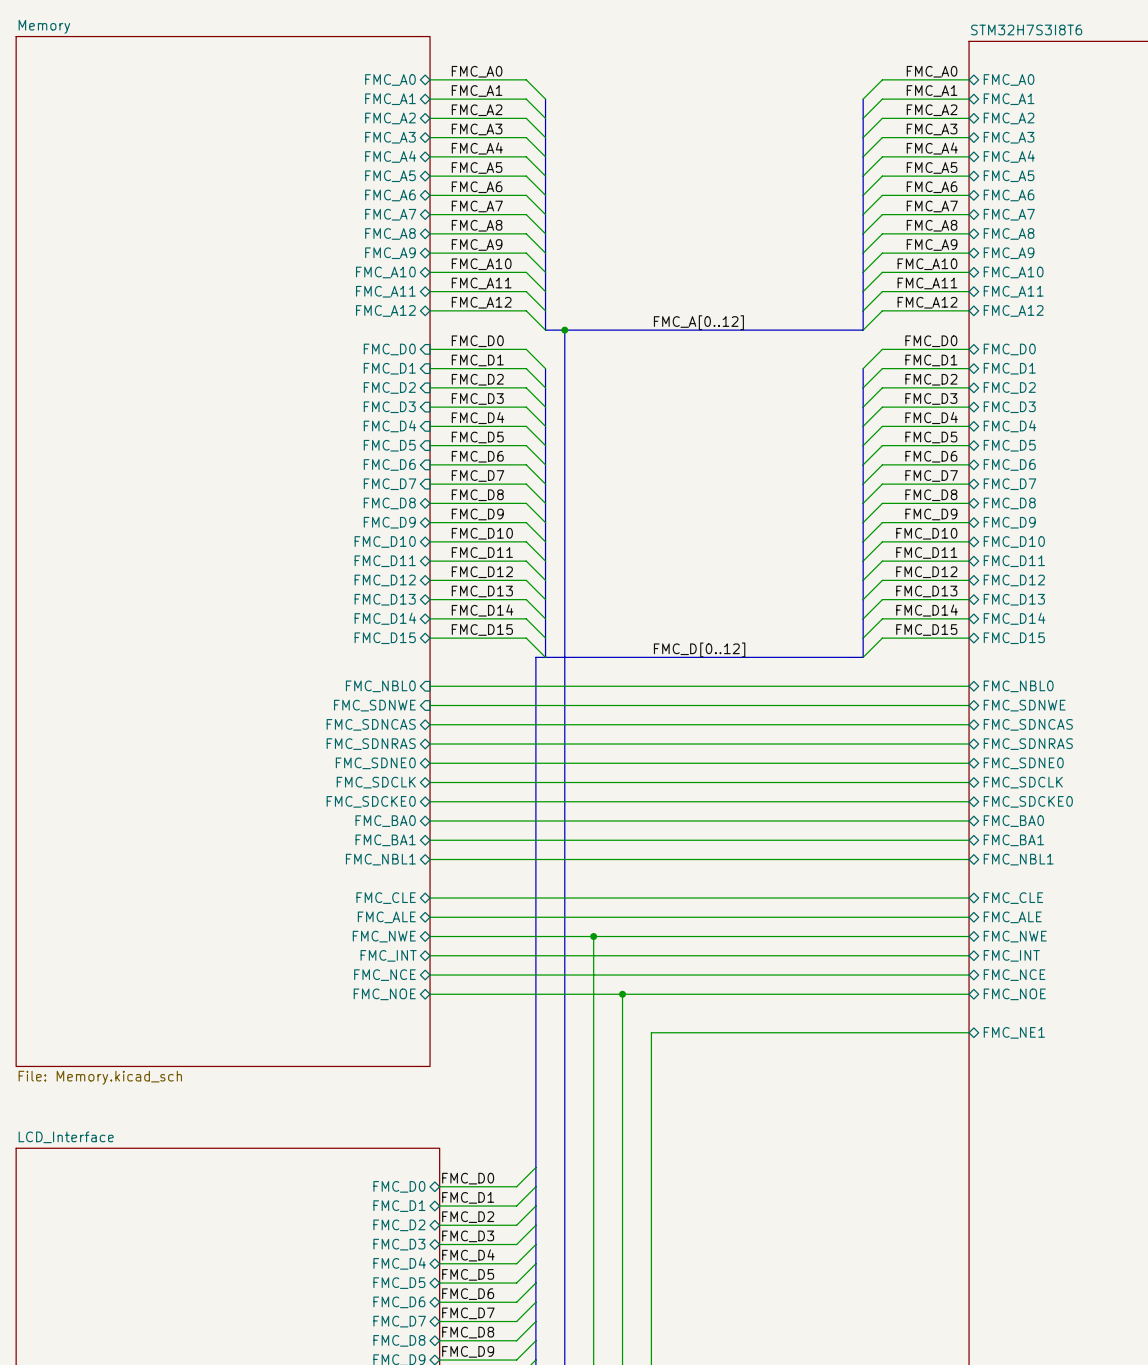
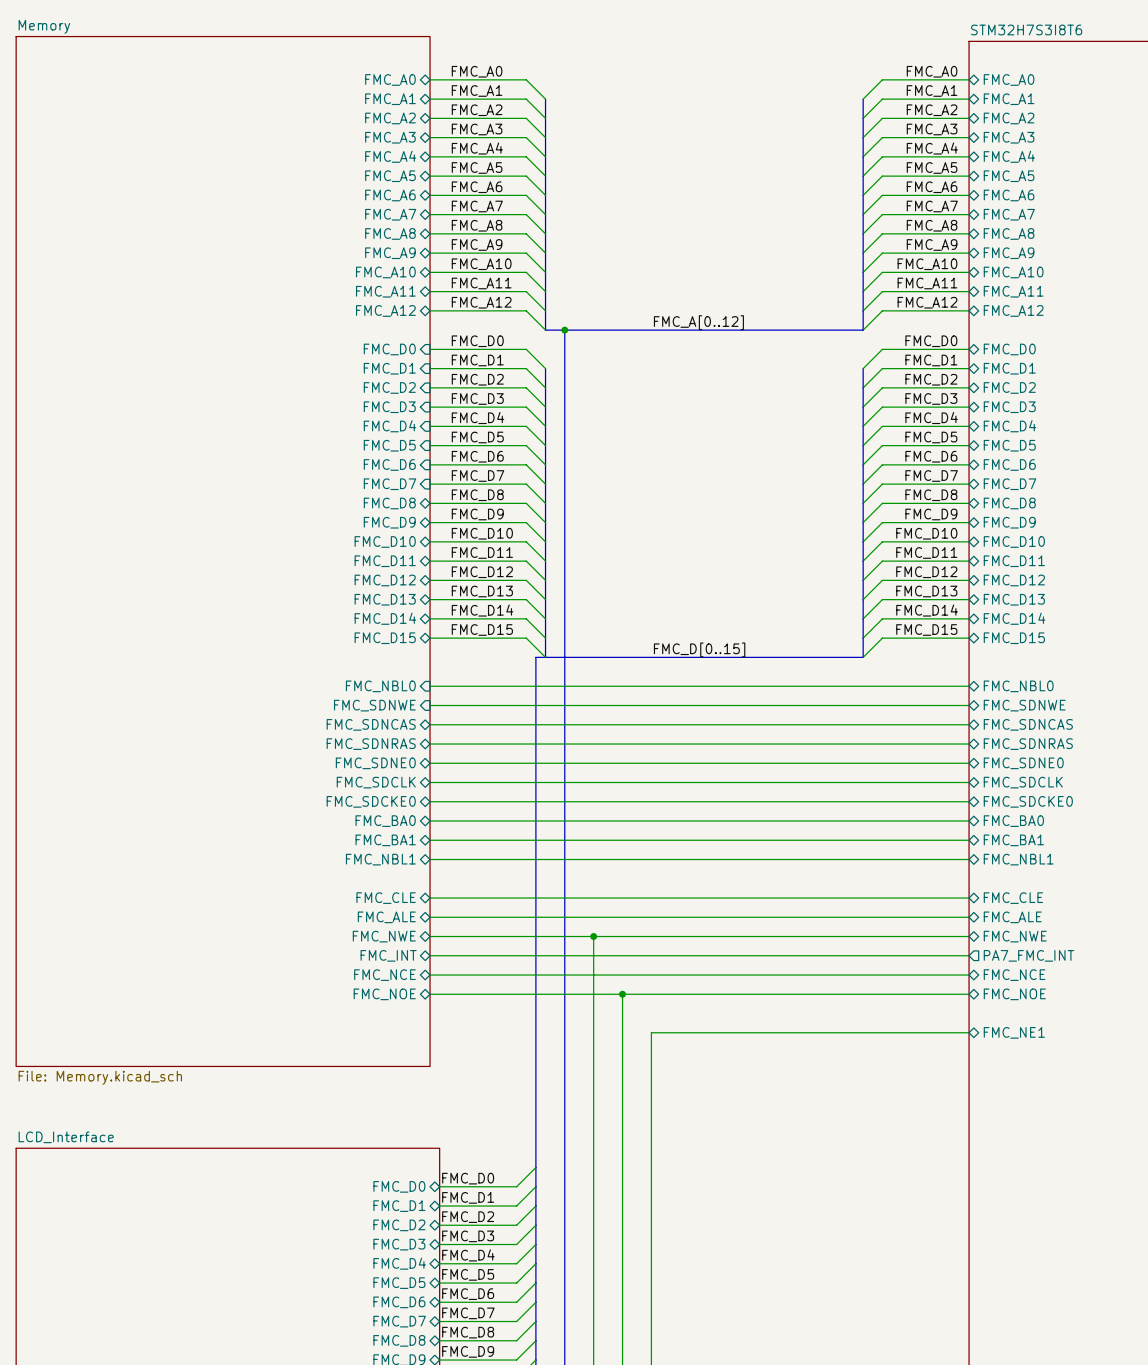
label: FMC_D[0..12] (699, 649) -> FMC_D[0..15] (699, 649)
sheet pin shape: bidirectional (1011, 955) -> output (1029, 955)
sheet pin: FMC_INT (1011, 955) -> PA7_FMC_INT (1029, 955)

